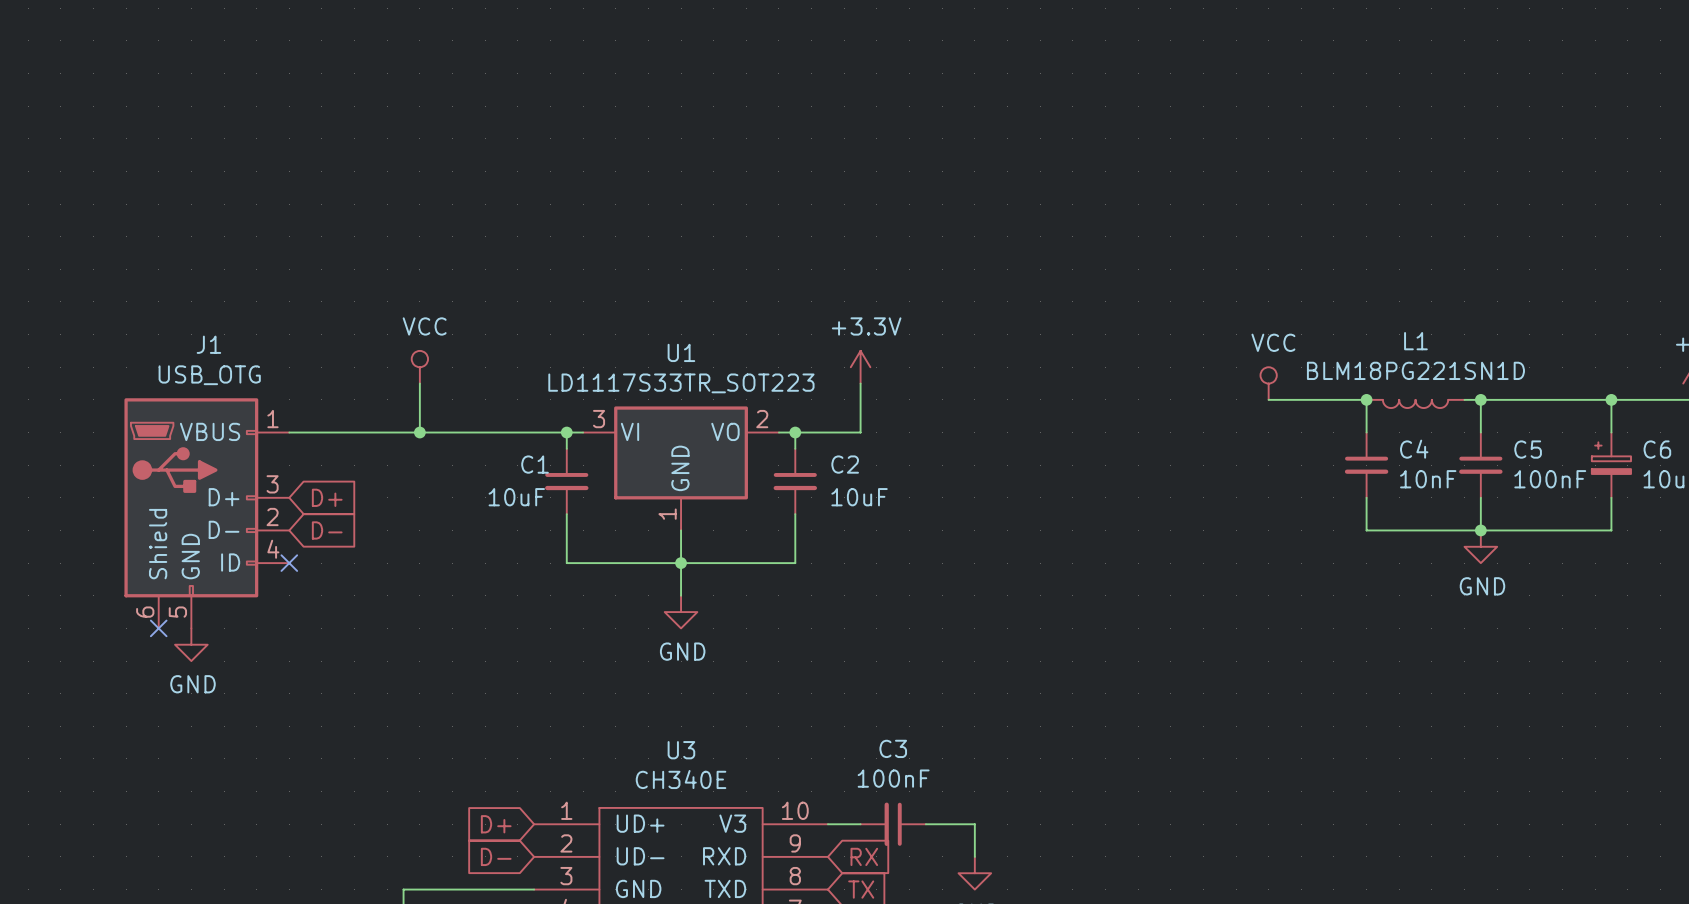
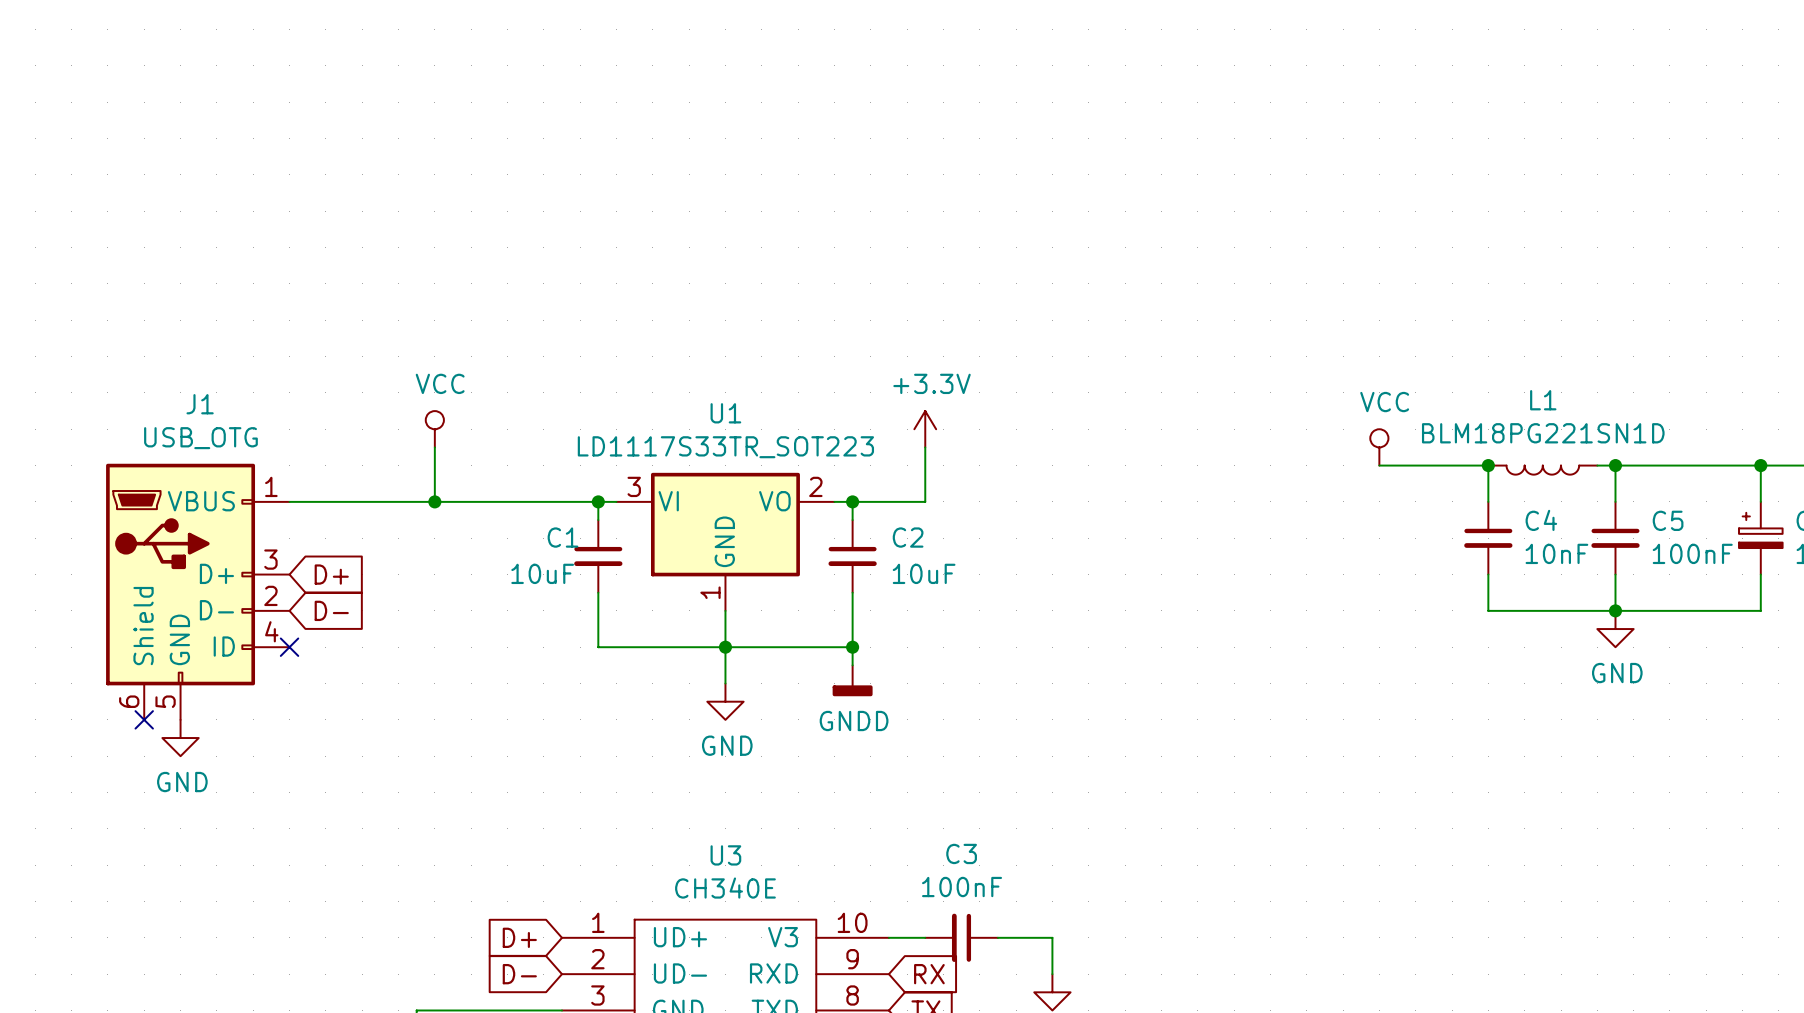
wire: none -> (852, 647) (852, 665)
junction: none -> (852, 647)
power symbol: none -> GNDD (852, 680)

